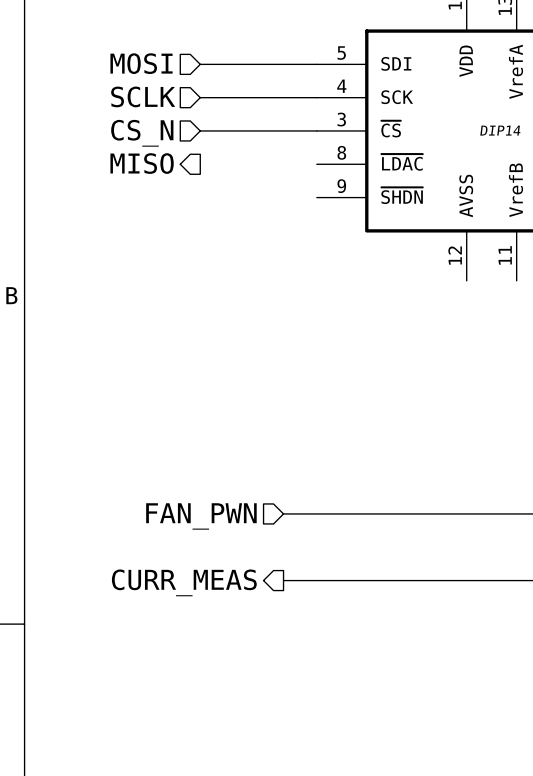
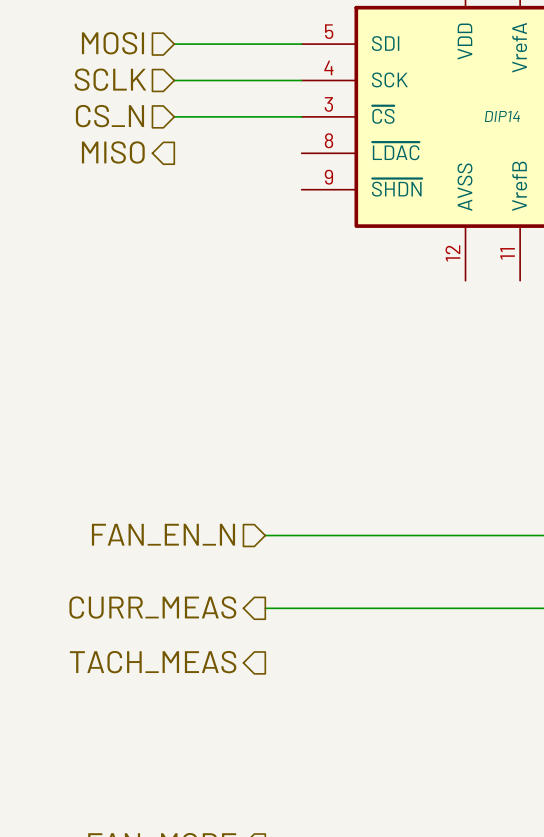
hierarchical label: FAN_PWN (201, 516) -> FAN_EN_N (163, 534)
hierarchical label: none -> TACH_MEAS (153, 662)

